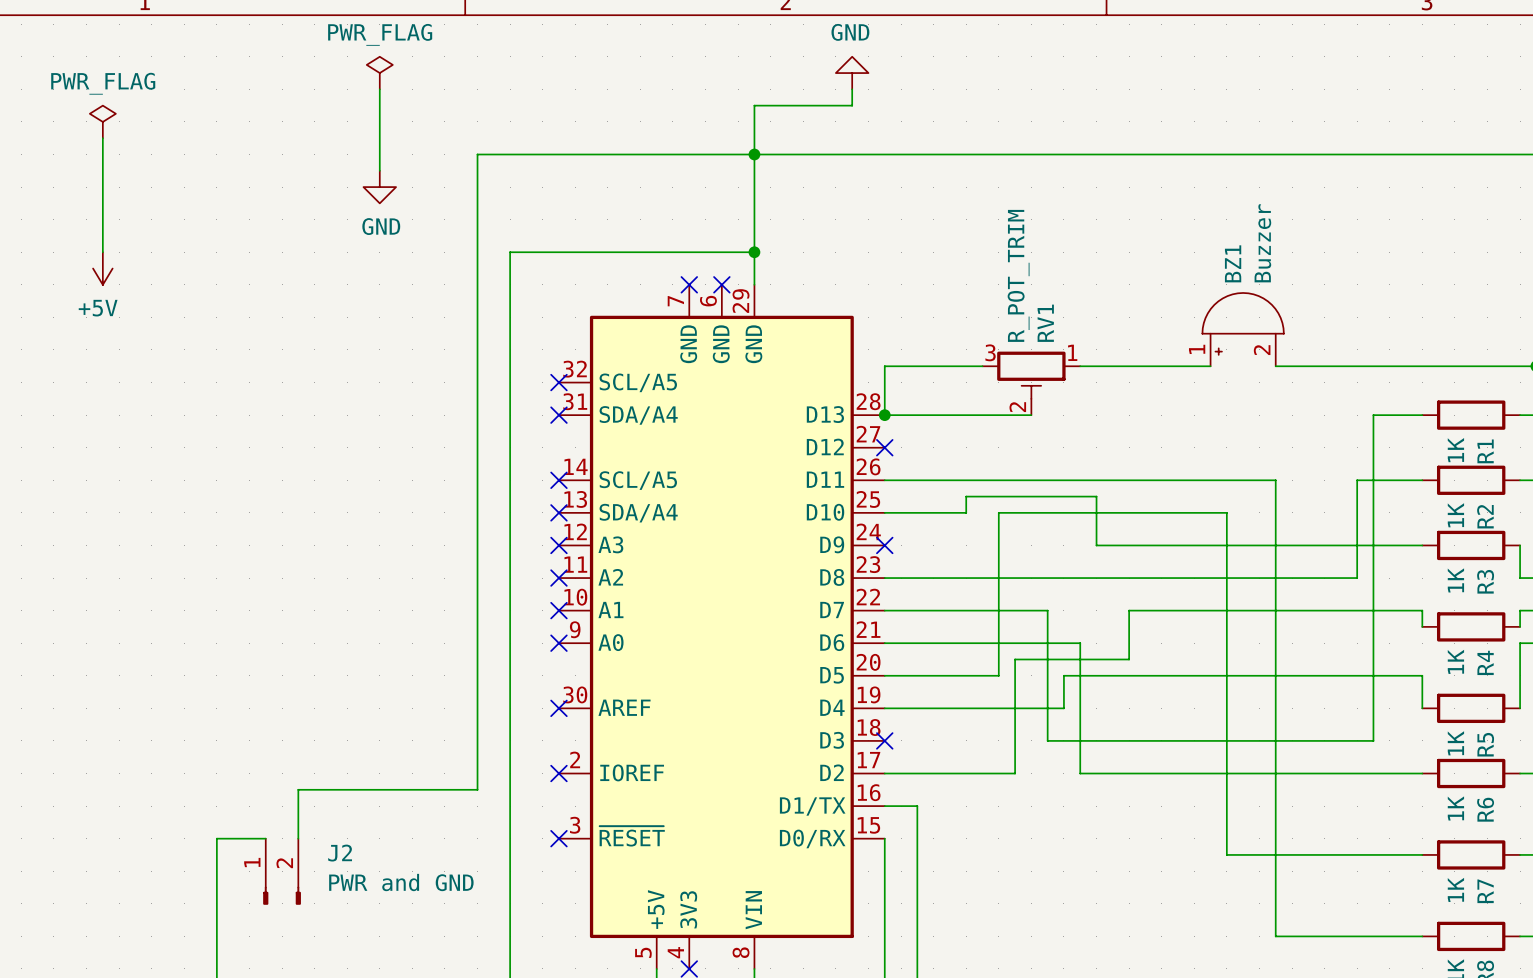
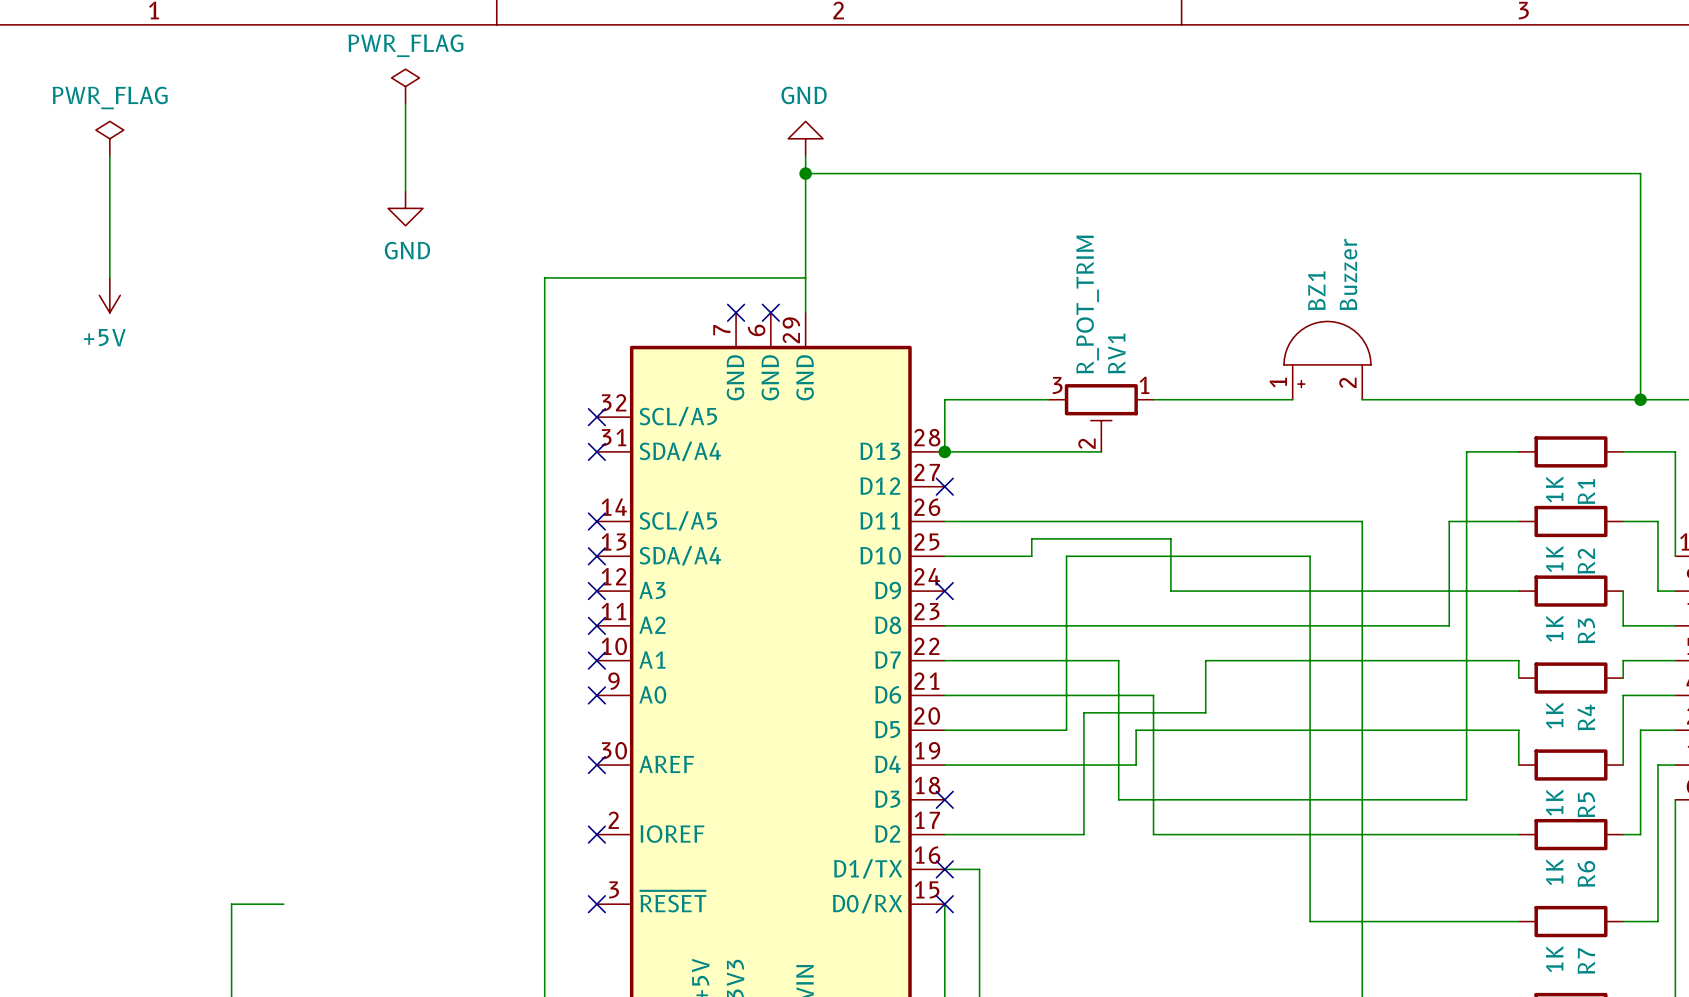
power symbol position: GND (852, 73) -> GND (805, 138)
wire: (852, 89) (852, 105) (754, 105) (754, 138) -> none
wire: (754, 154) (477, 154) (477, 789) (298, 789) (298, 838) -> none
junction: (754, 252) -> none
no-connect mark: none -> (944, 869)
no-connect mark: none -> (944, 904)
J2: PWR and GND (282, 871) -> none

